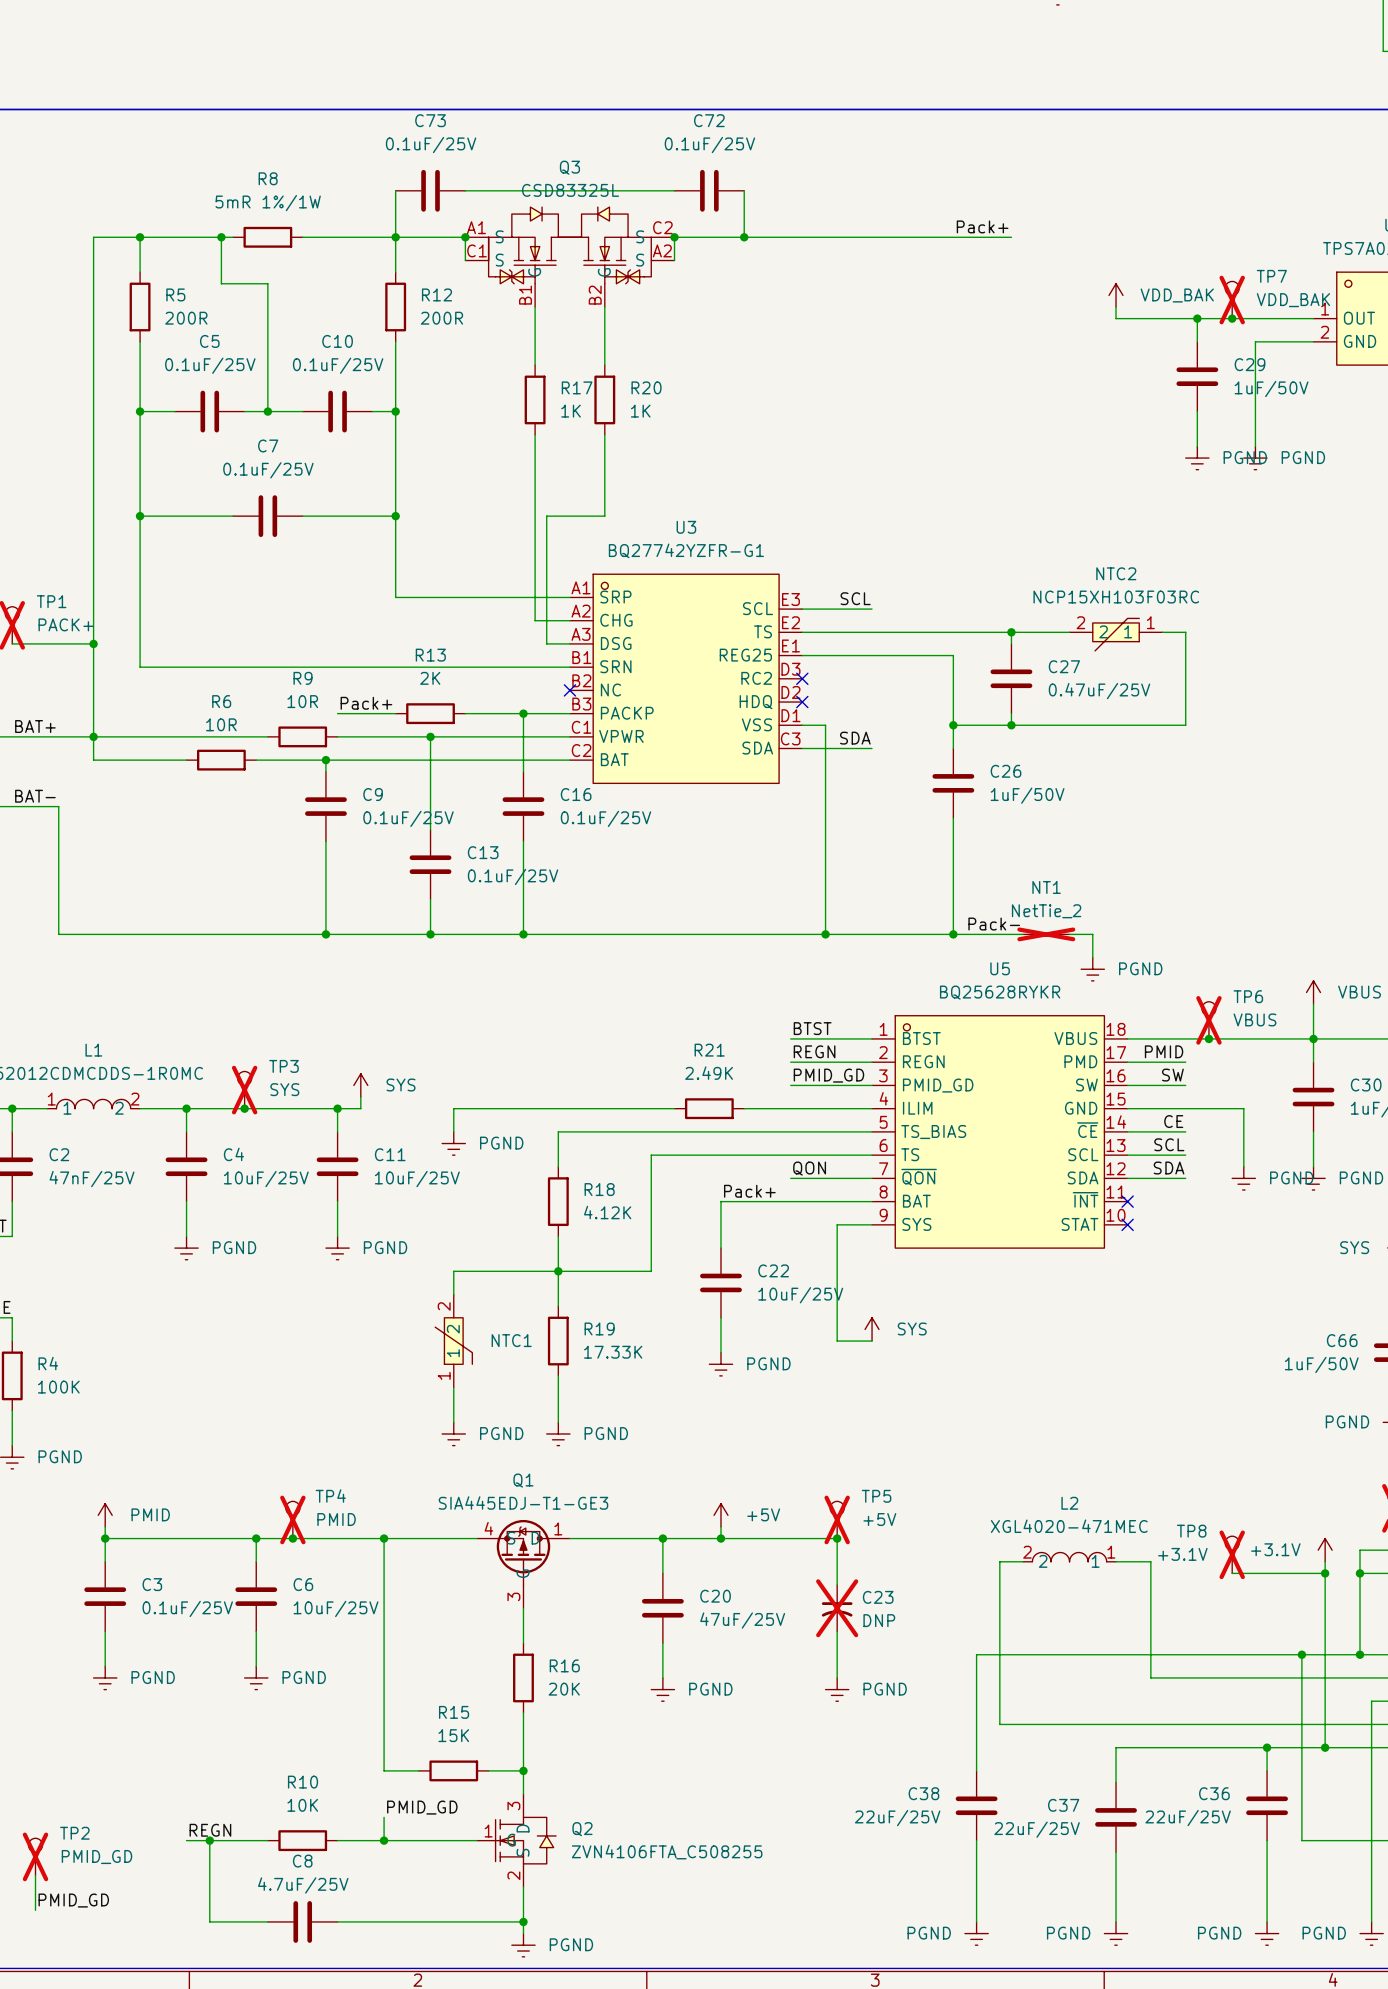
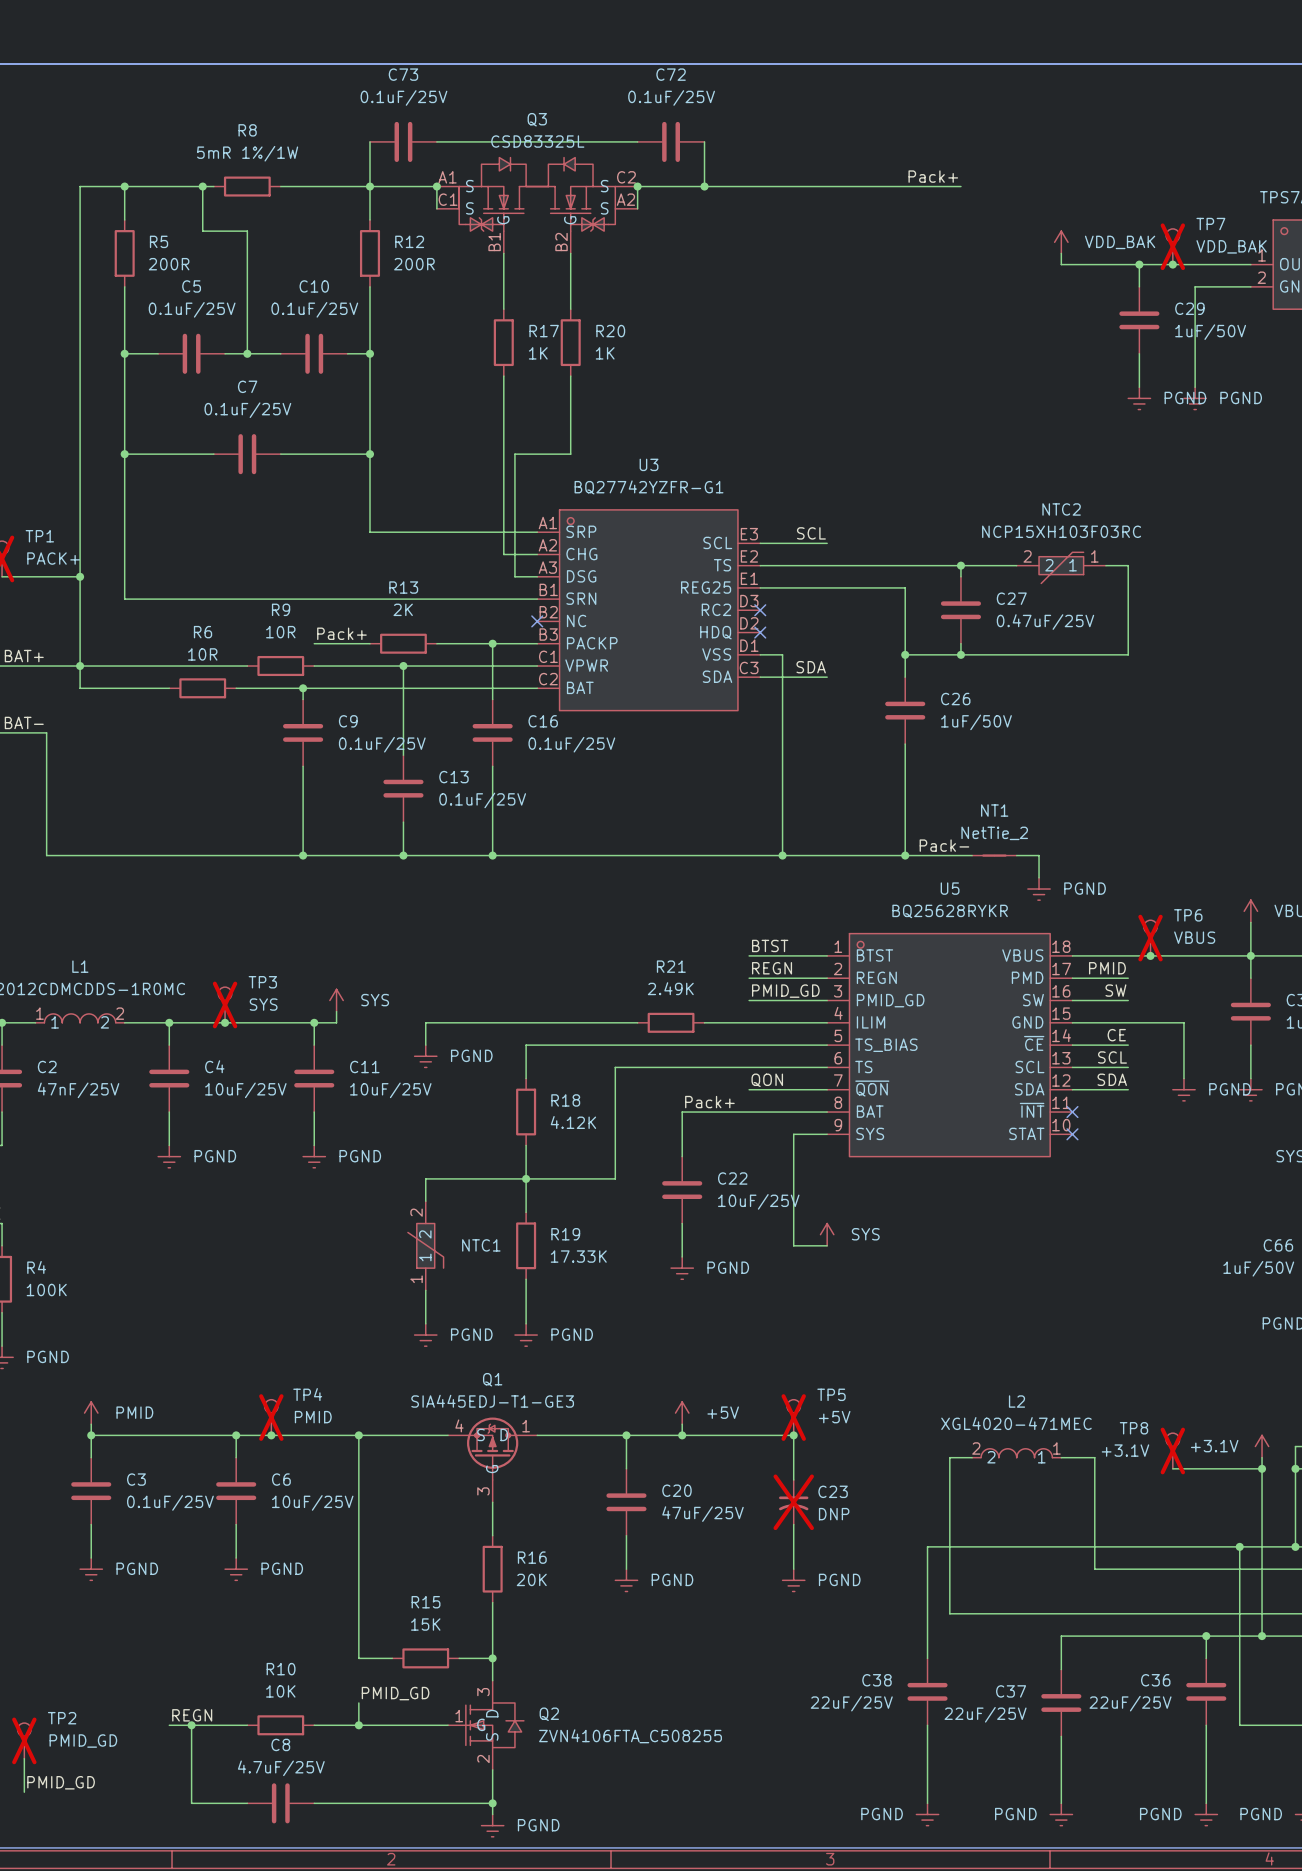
NT1 do-not-place cross: (1046, 934) -> none

